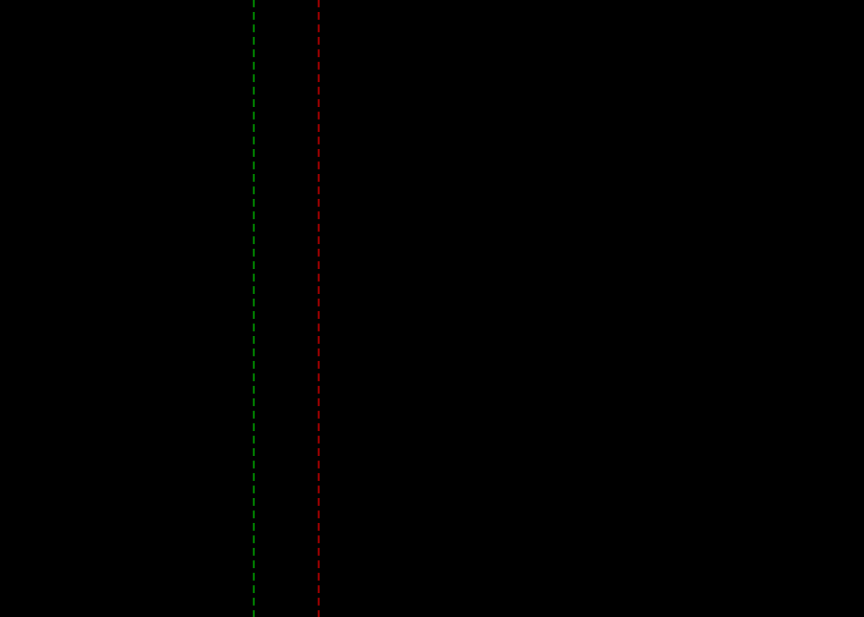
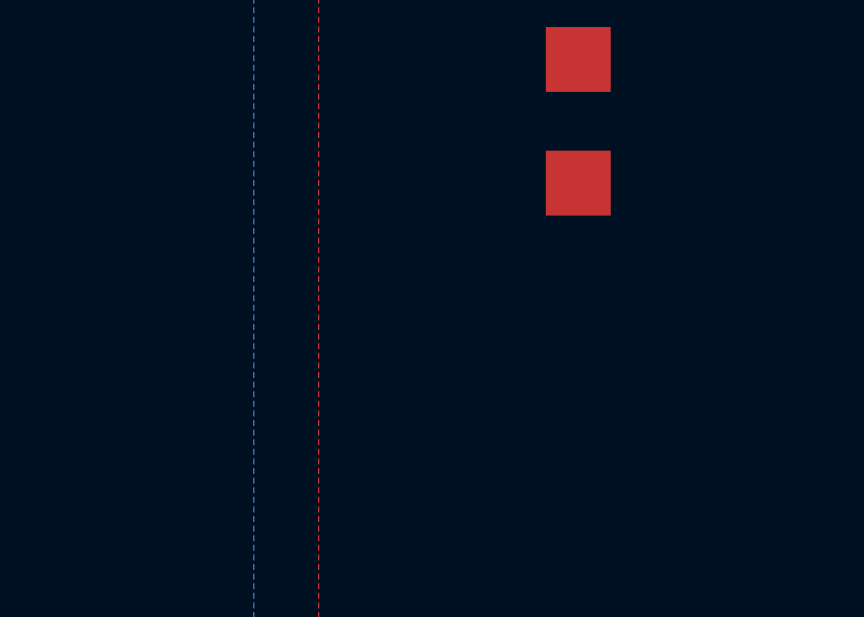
part: none -> (578, 59)
part: none -> (578, 183)

